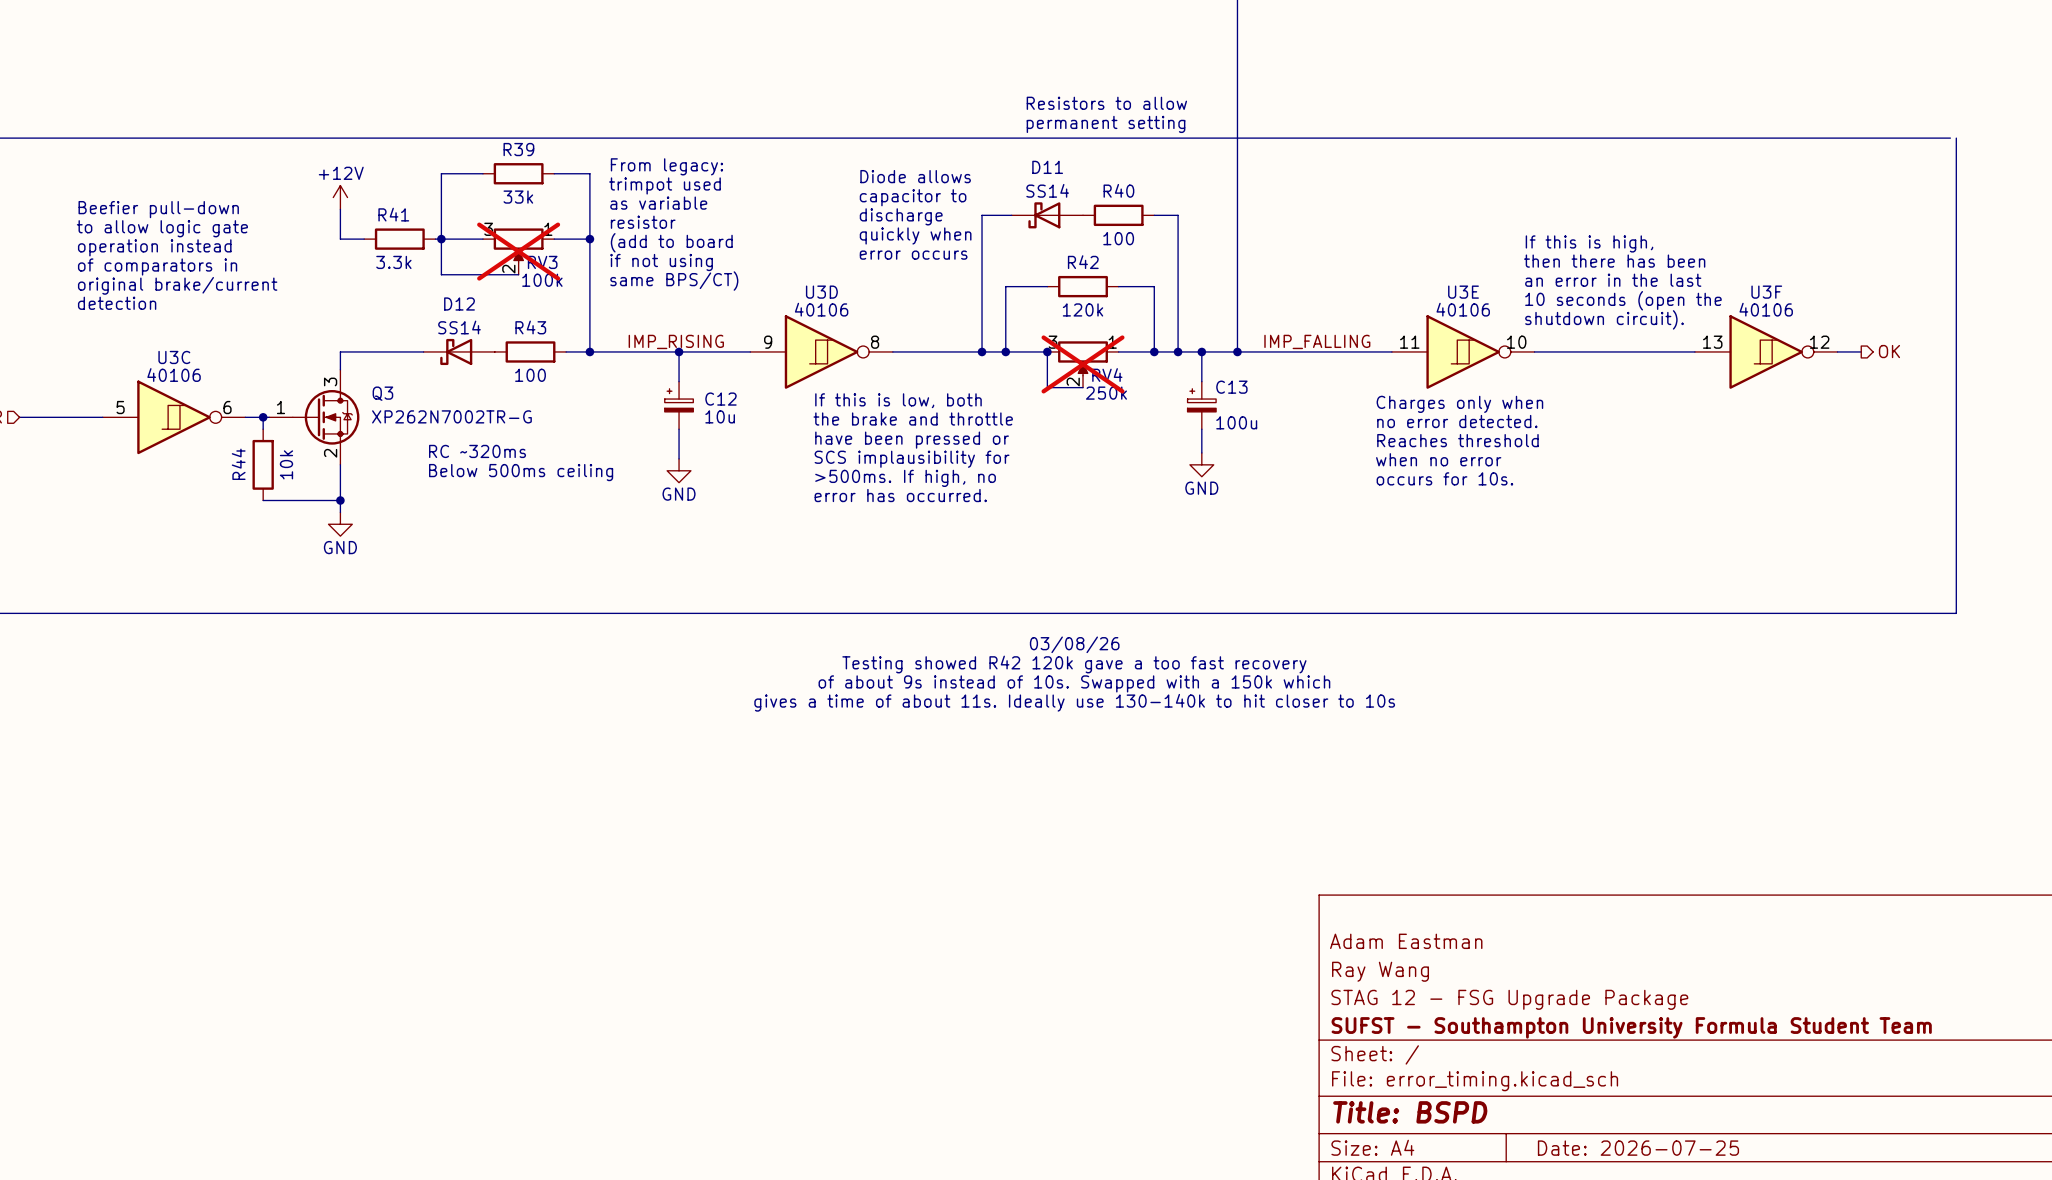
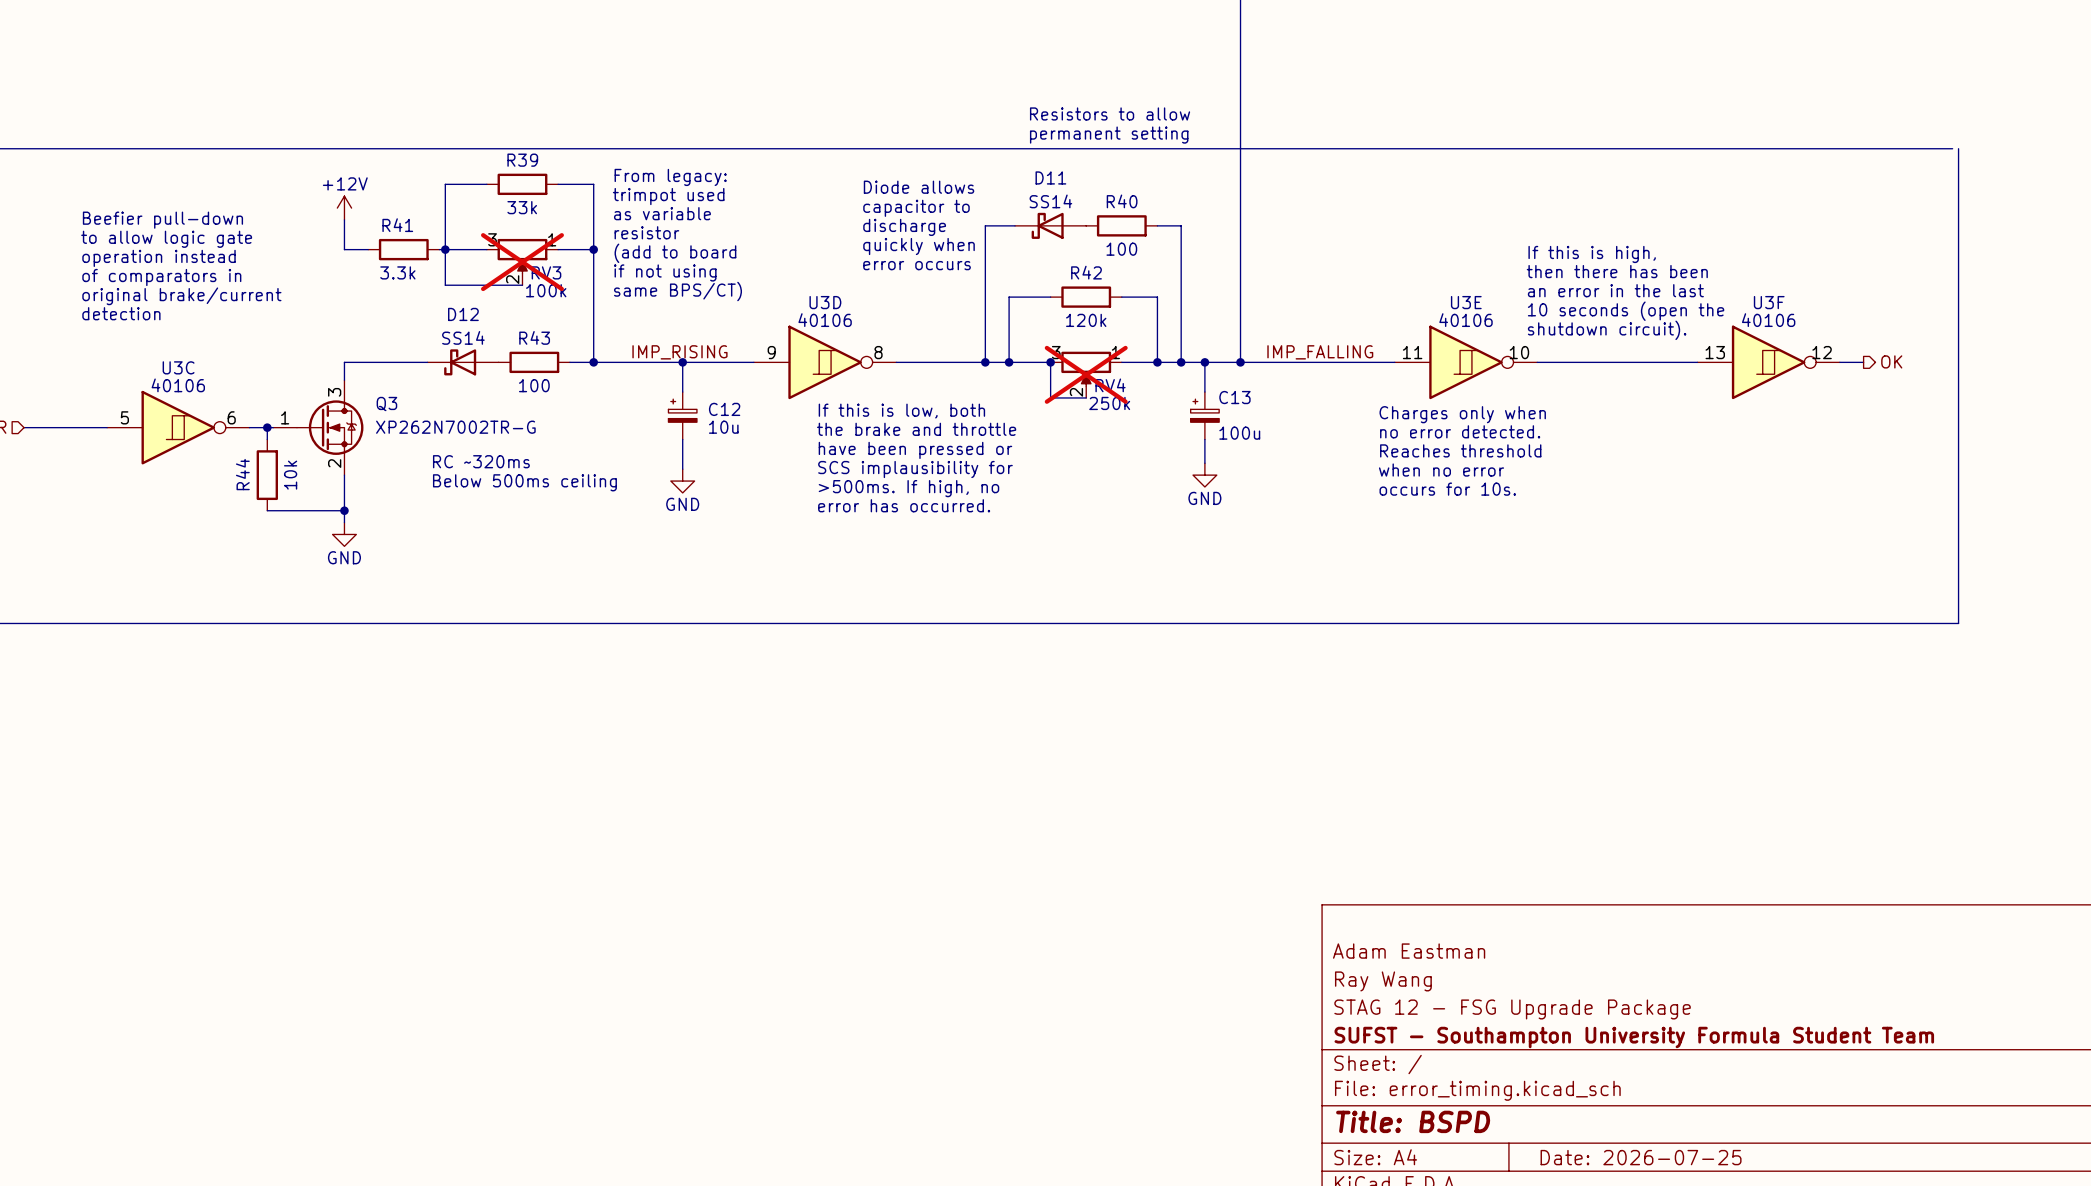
text: 03/08/26 (1074, 644) -> none
text: Testing showed R42 120k gave a too fast recovery (1074, 664) -> none
text: of about 9s instead of 10s. Swapped with a 150k which (1074, 683) -> none
text: gives a time of about 11s. Ideally use 130-140k to hit closer to 10s (1074, 702) -> none

